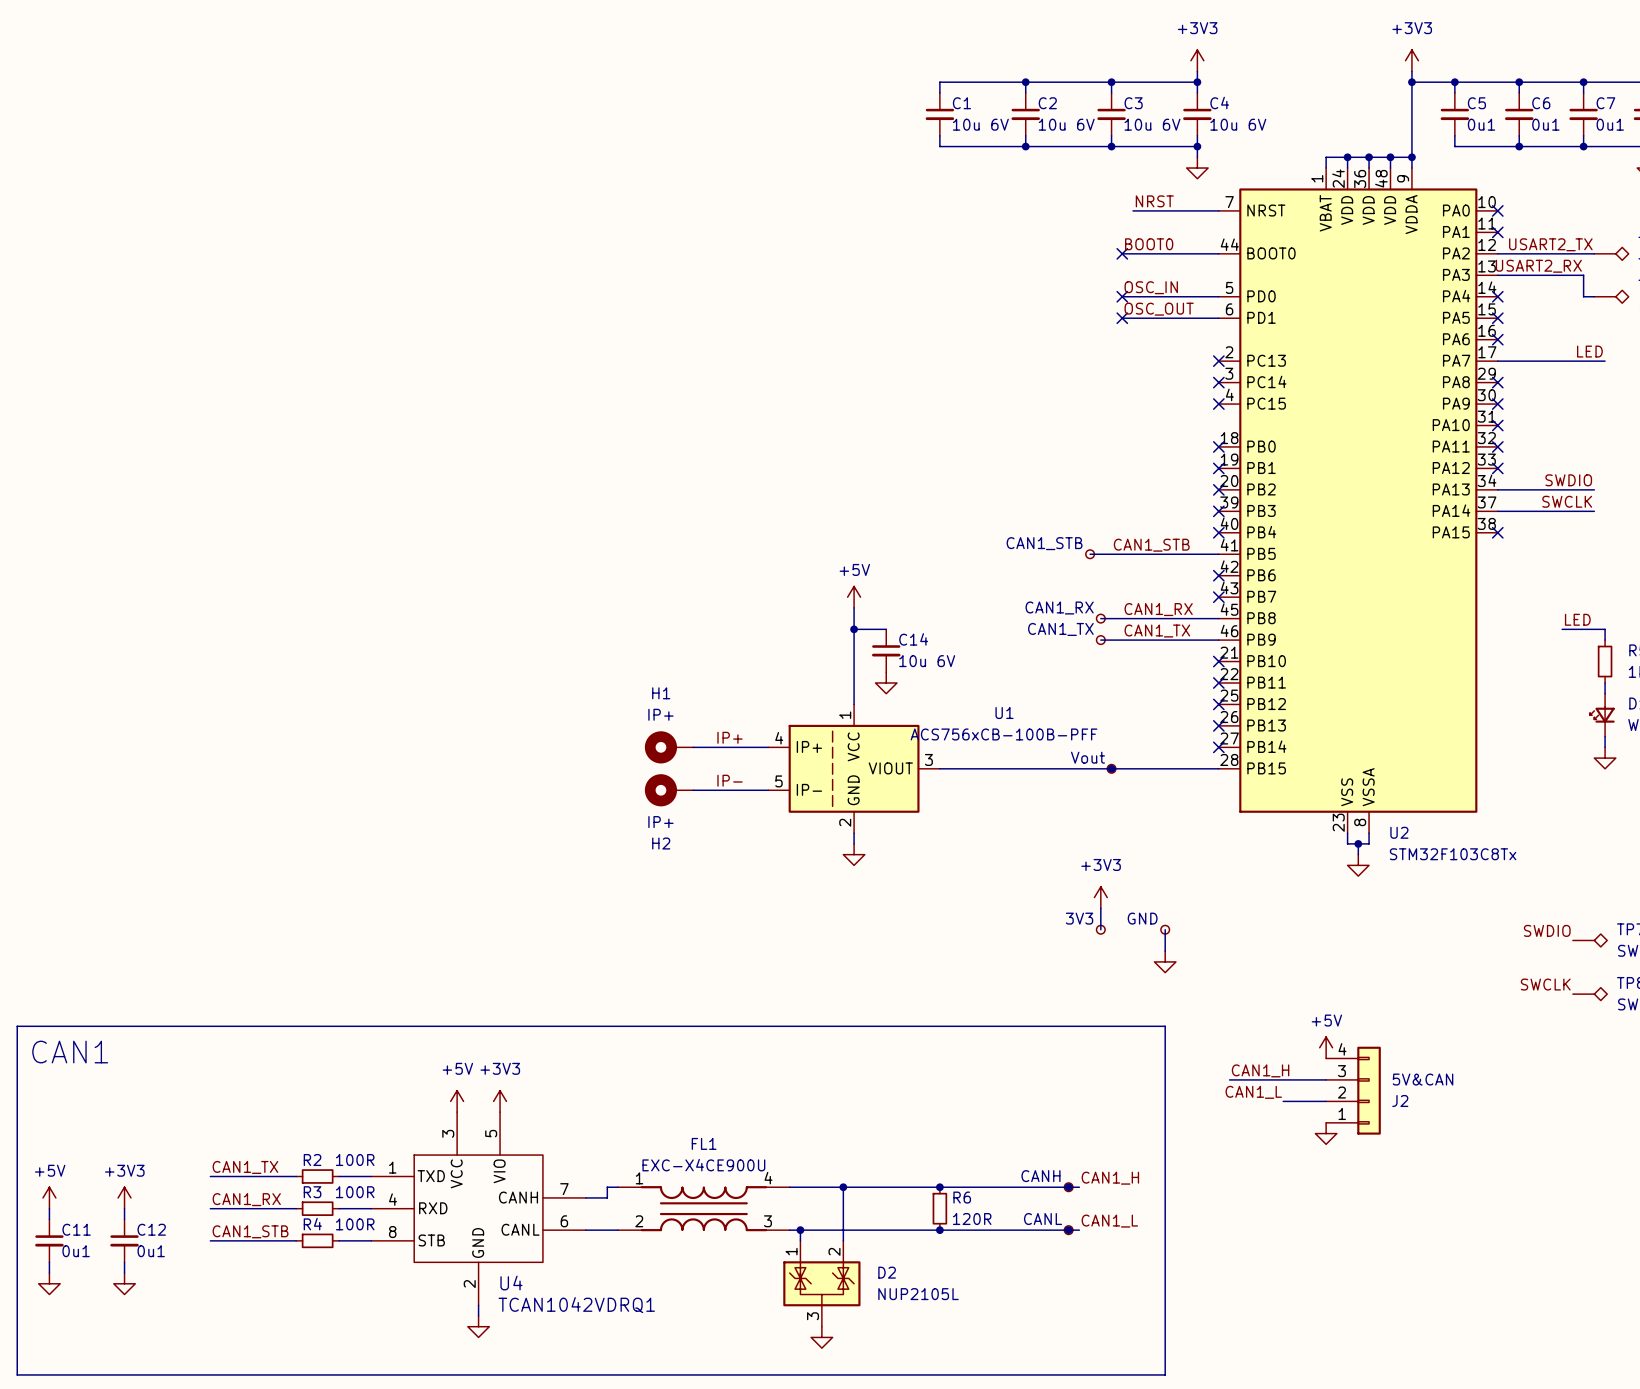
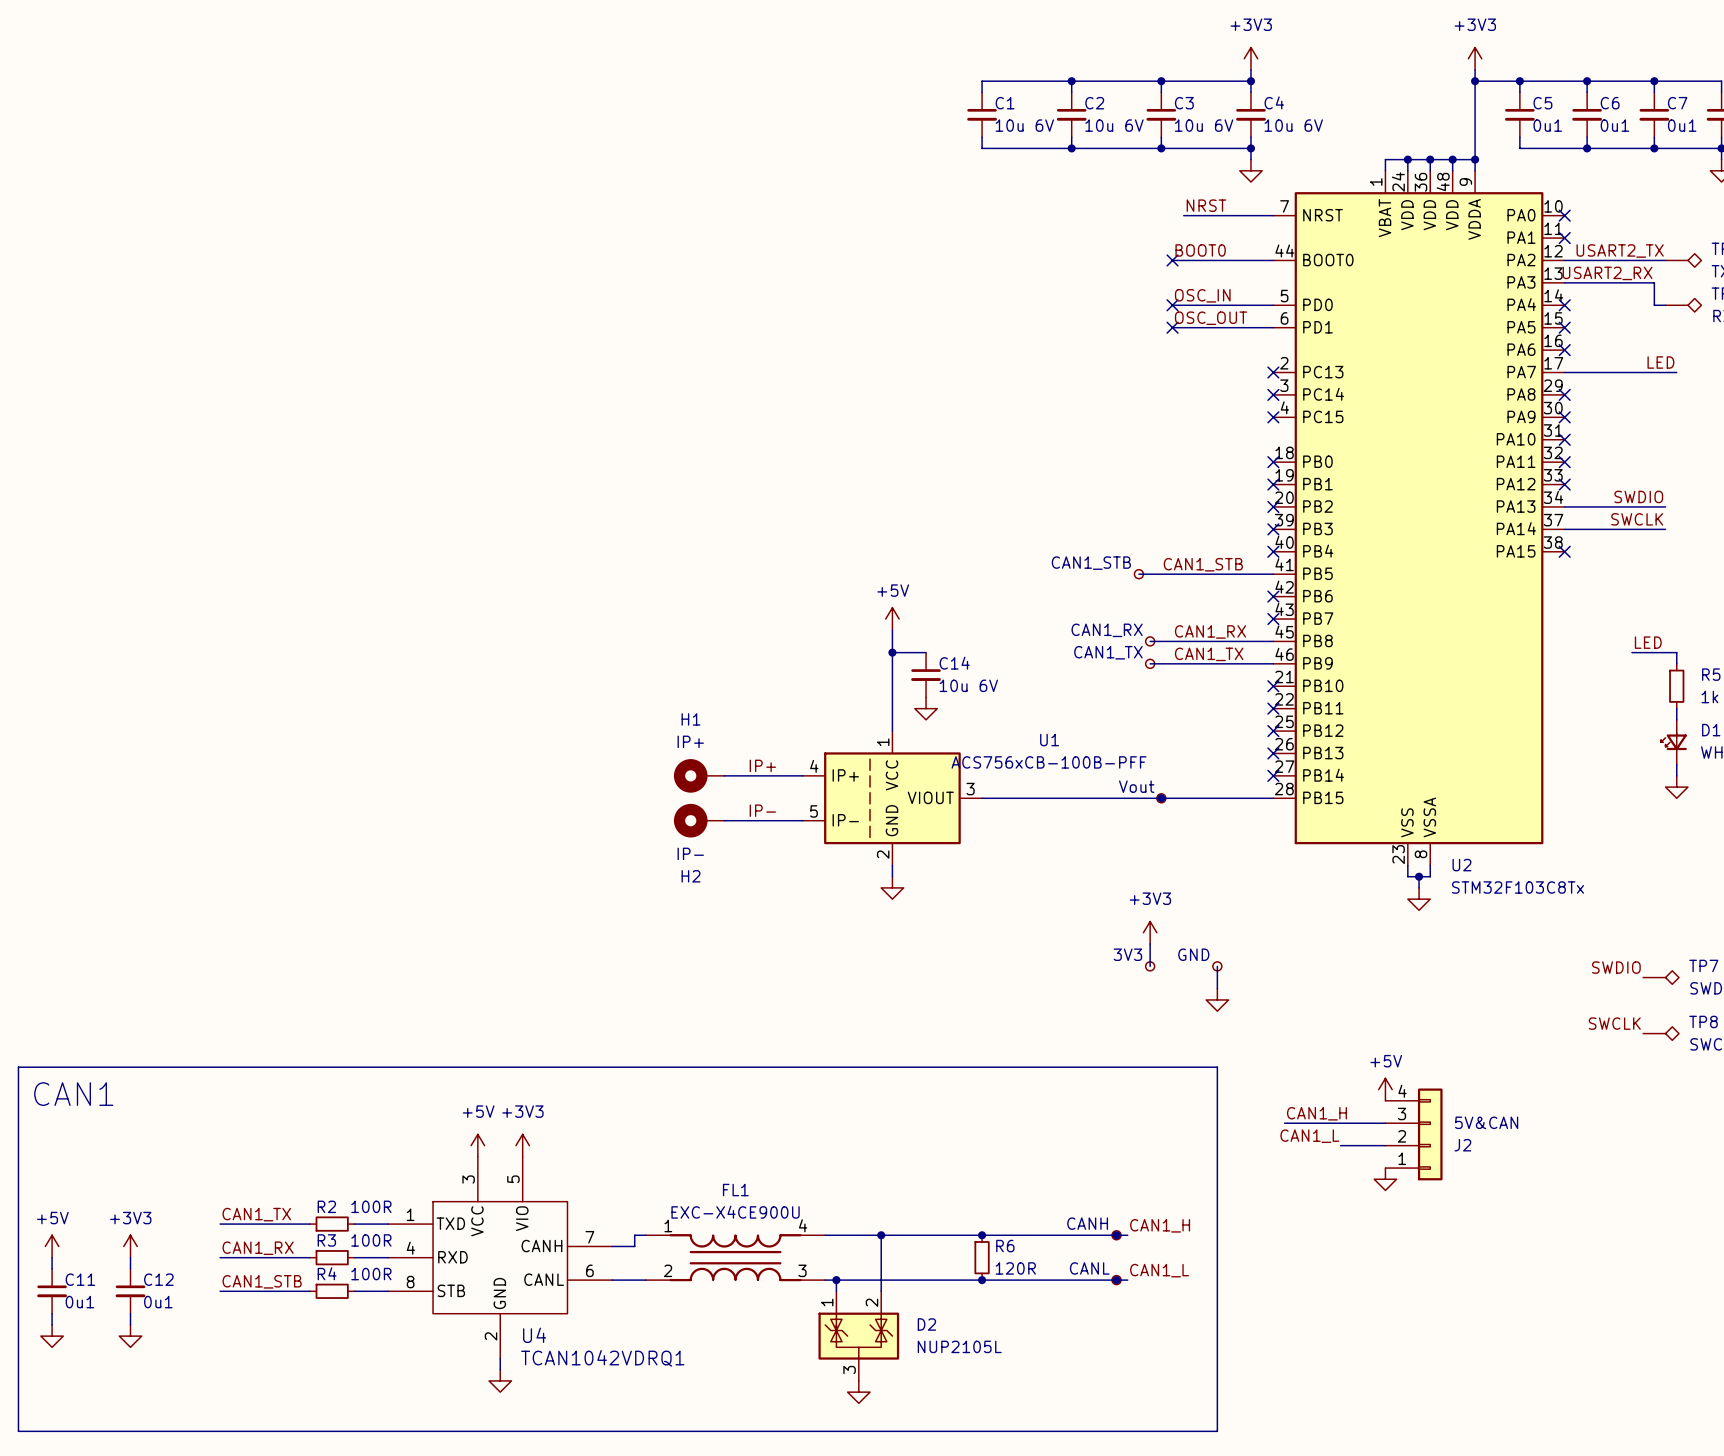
H2 value: IP+ (660, 822) -> IP- (690, 853)

